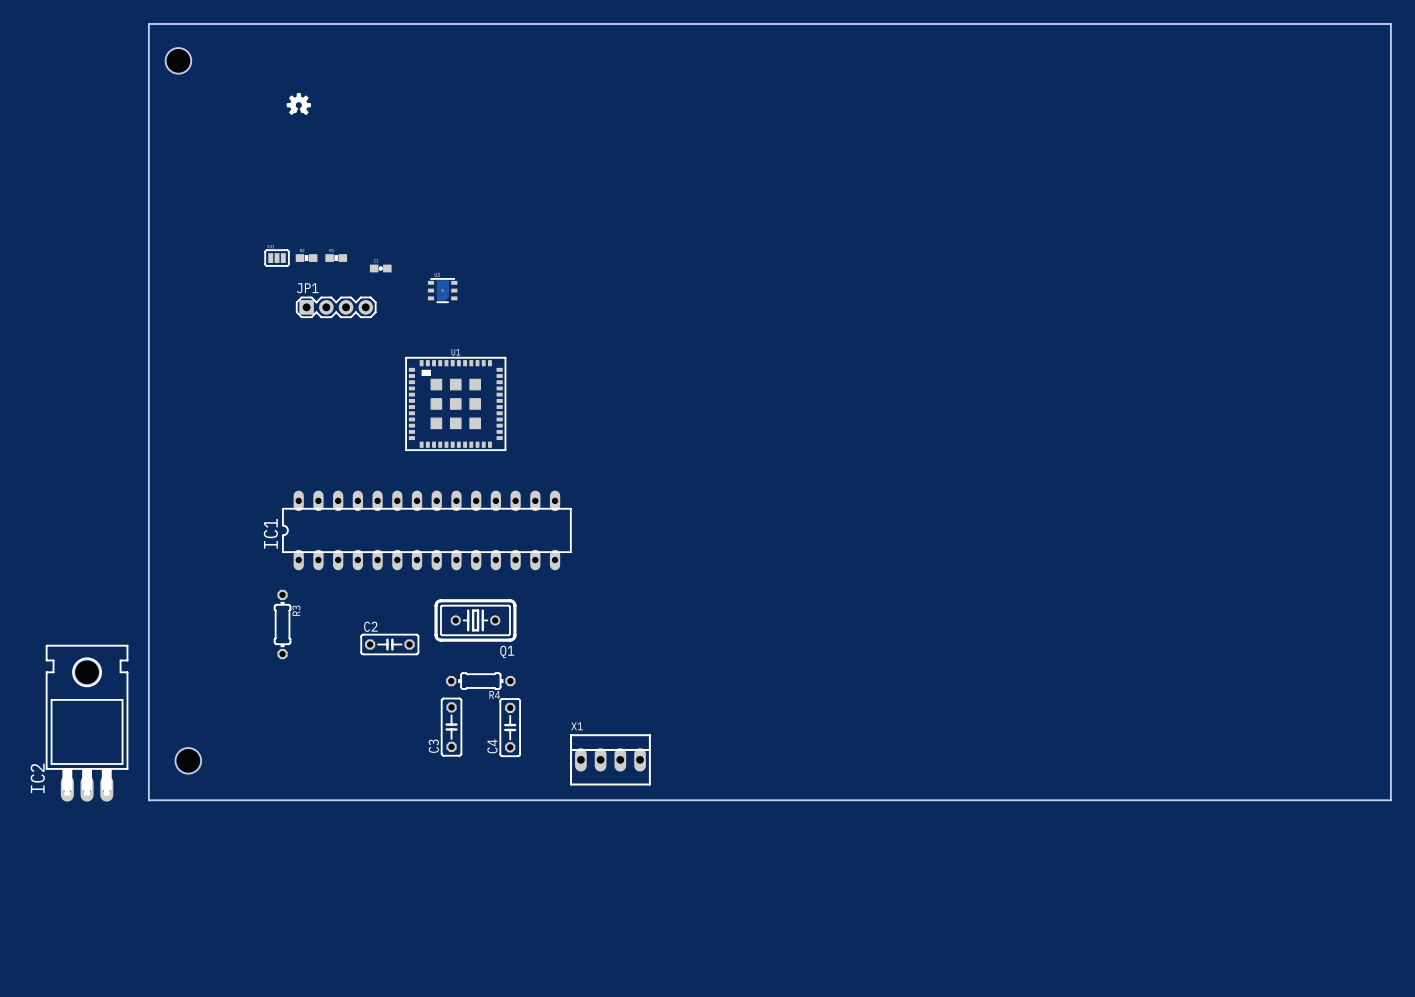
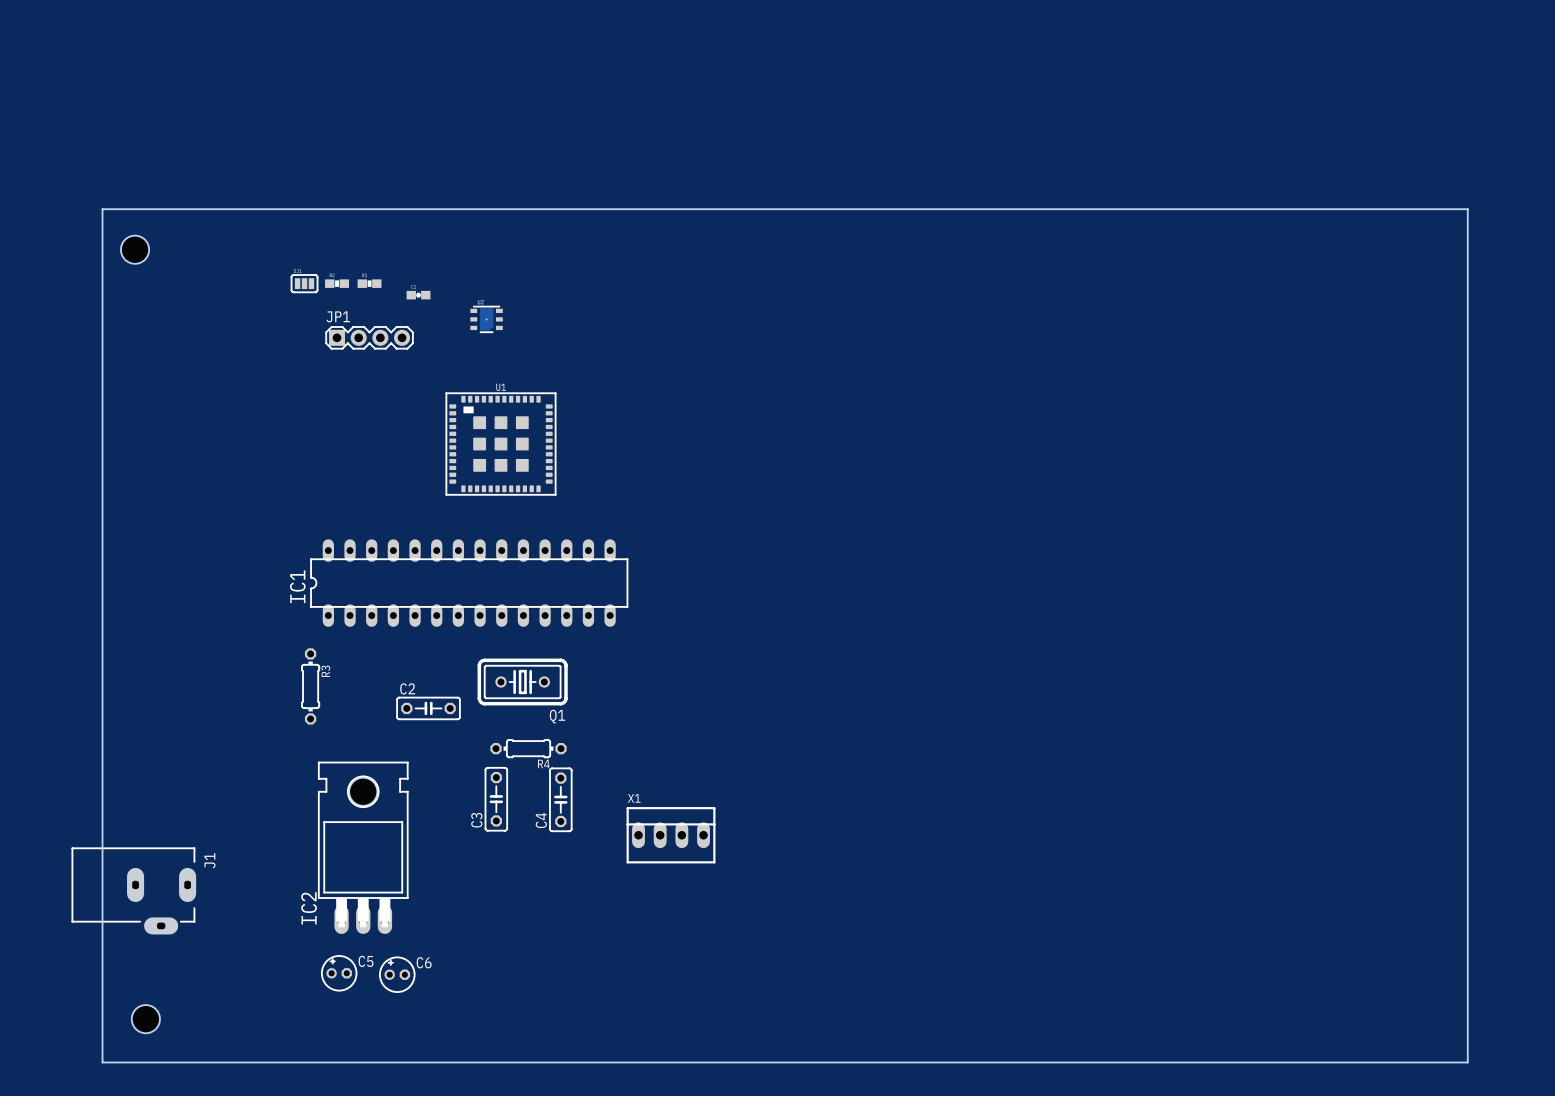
board edge: (148, 23) (1390, 23) (1390, 800) (148, 800) (148, 23) -> (102, 209) (102, 1062) (1467, 1062) (1467, 209) (102, 209)
part position: (178, 60) -> (135, 249)
drawing: [286, 93, 311, 115] -> none
IC2 position: (87, 723) -> (363, 847)
part position: (188, 760) -> (145, 1019)
J1: none -> (133, 890)
C5: none -> (339, 973)
C6: none -> (397, 974)

